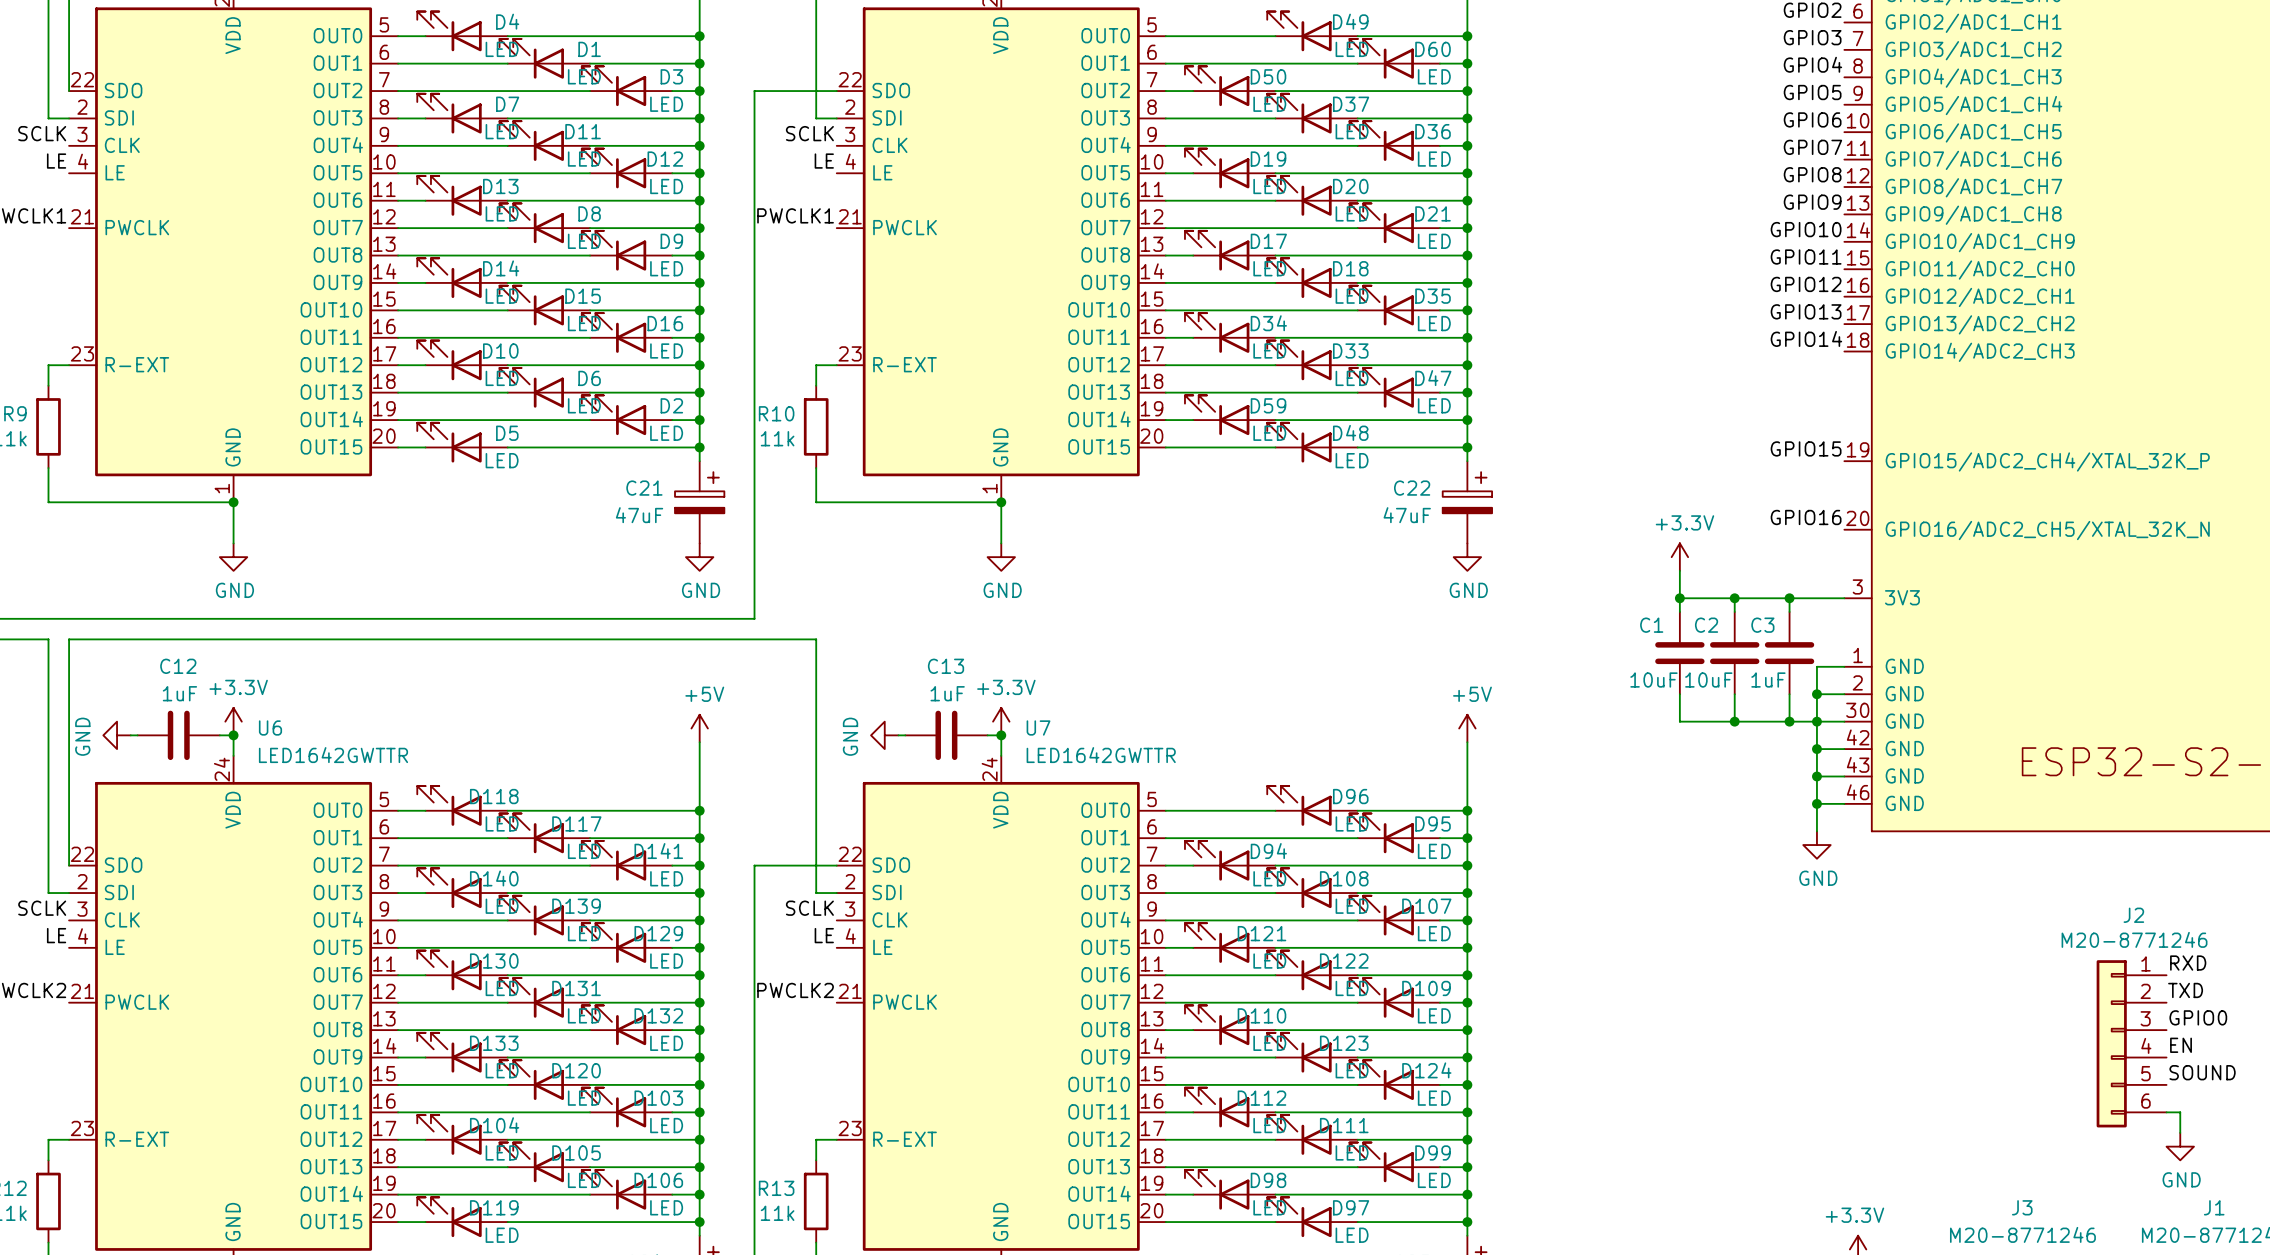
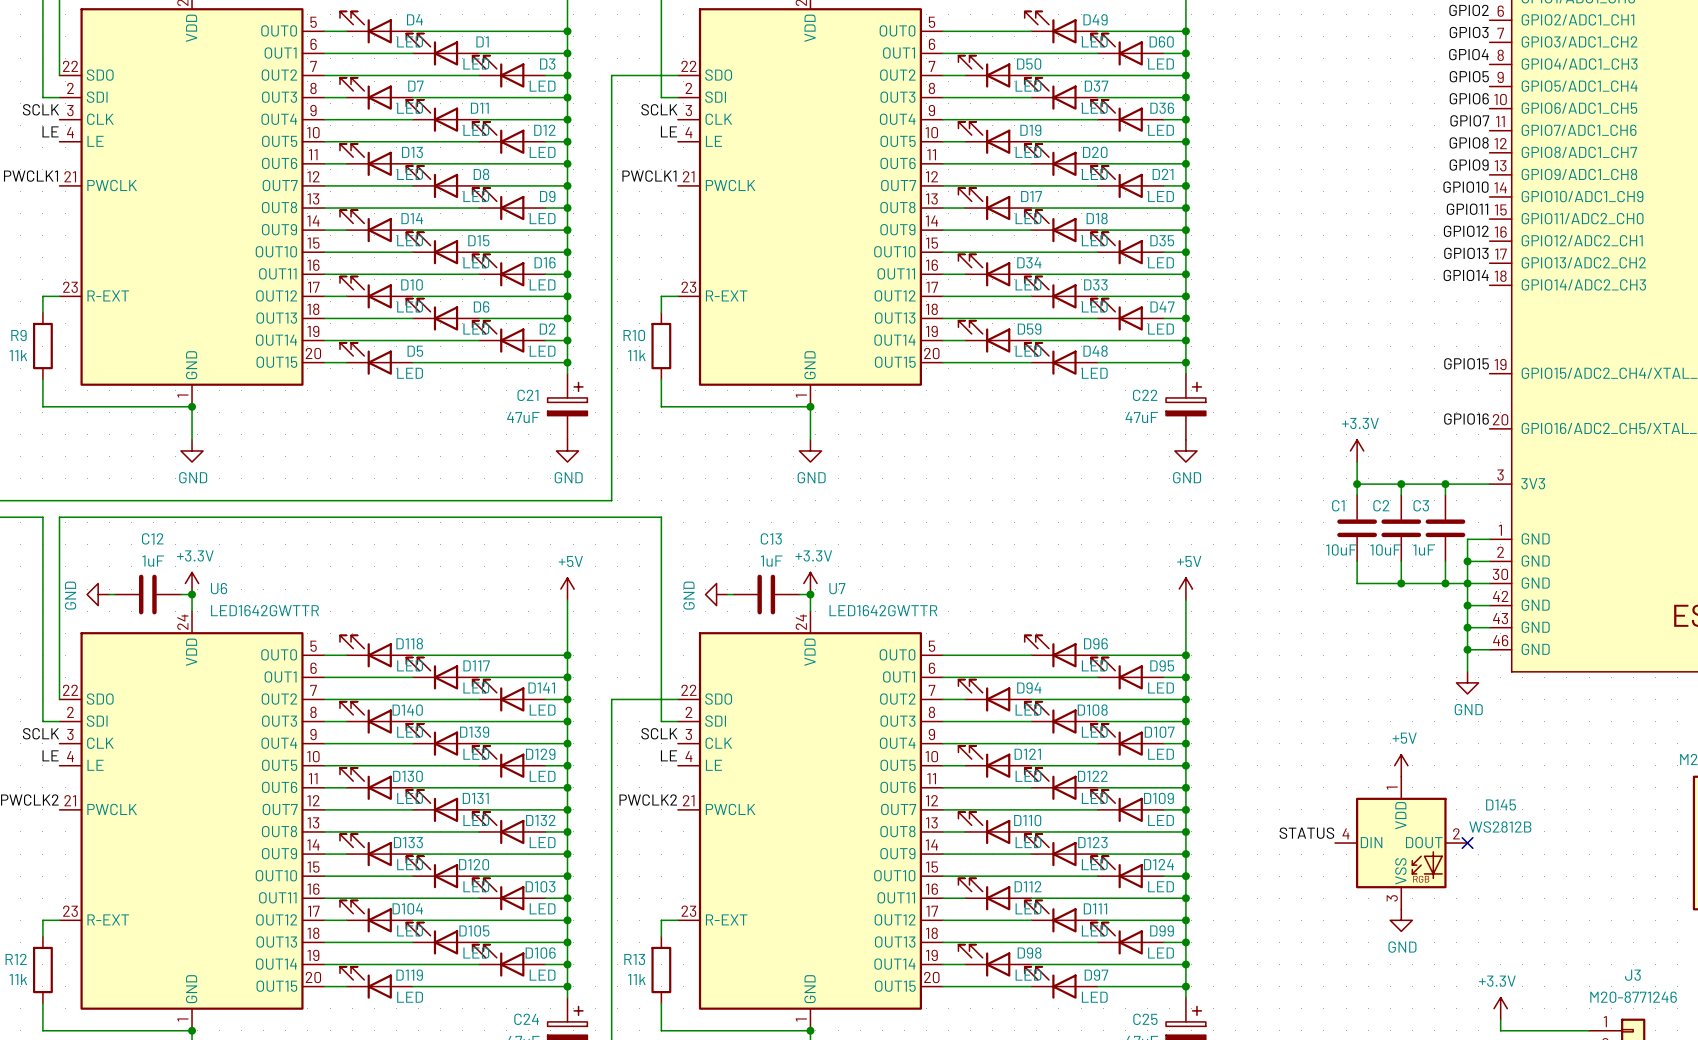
power symbol: none -> +5V (1401, 765)
label: none -> STATUS (1306, 833)
D145: none -> WS2812B (1401, 843)
no-connect mark: none -> (1467, 843)
power symbol: none -> GND (1401, 920)

